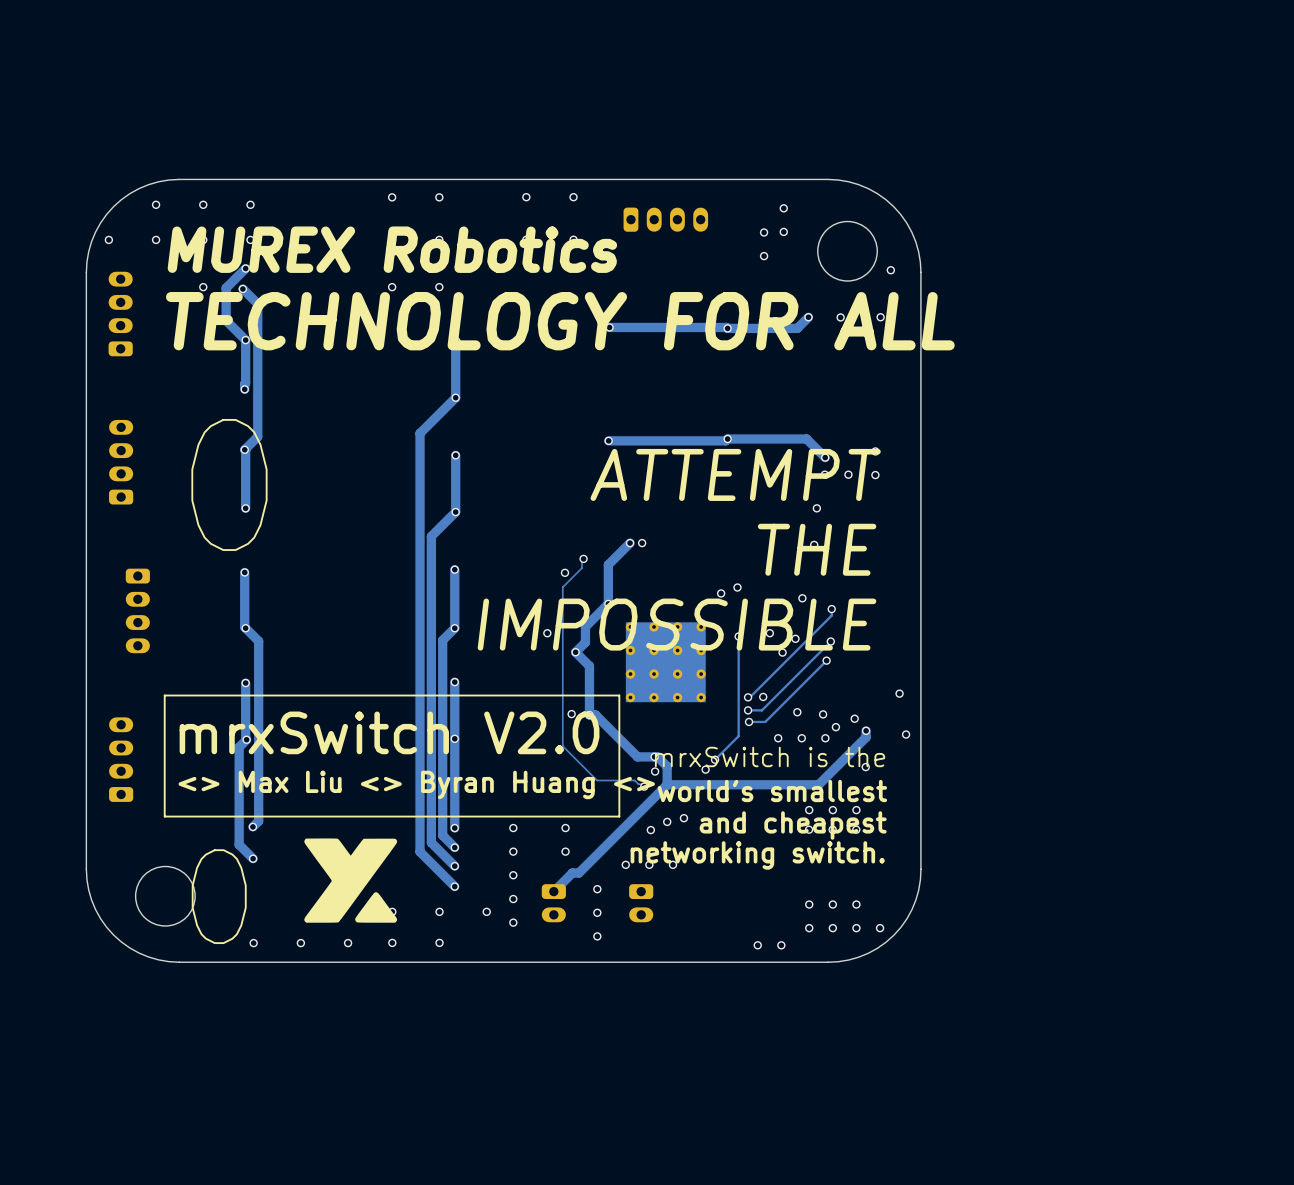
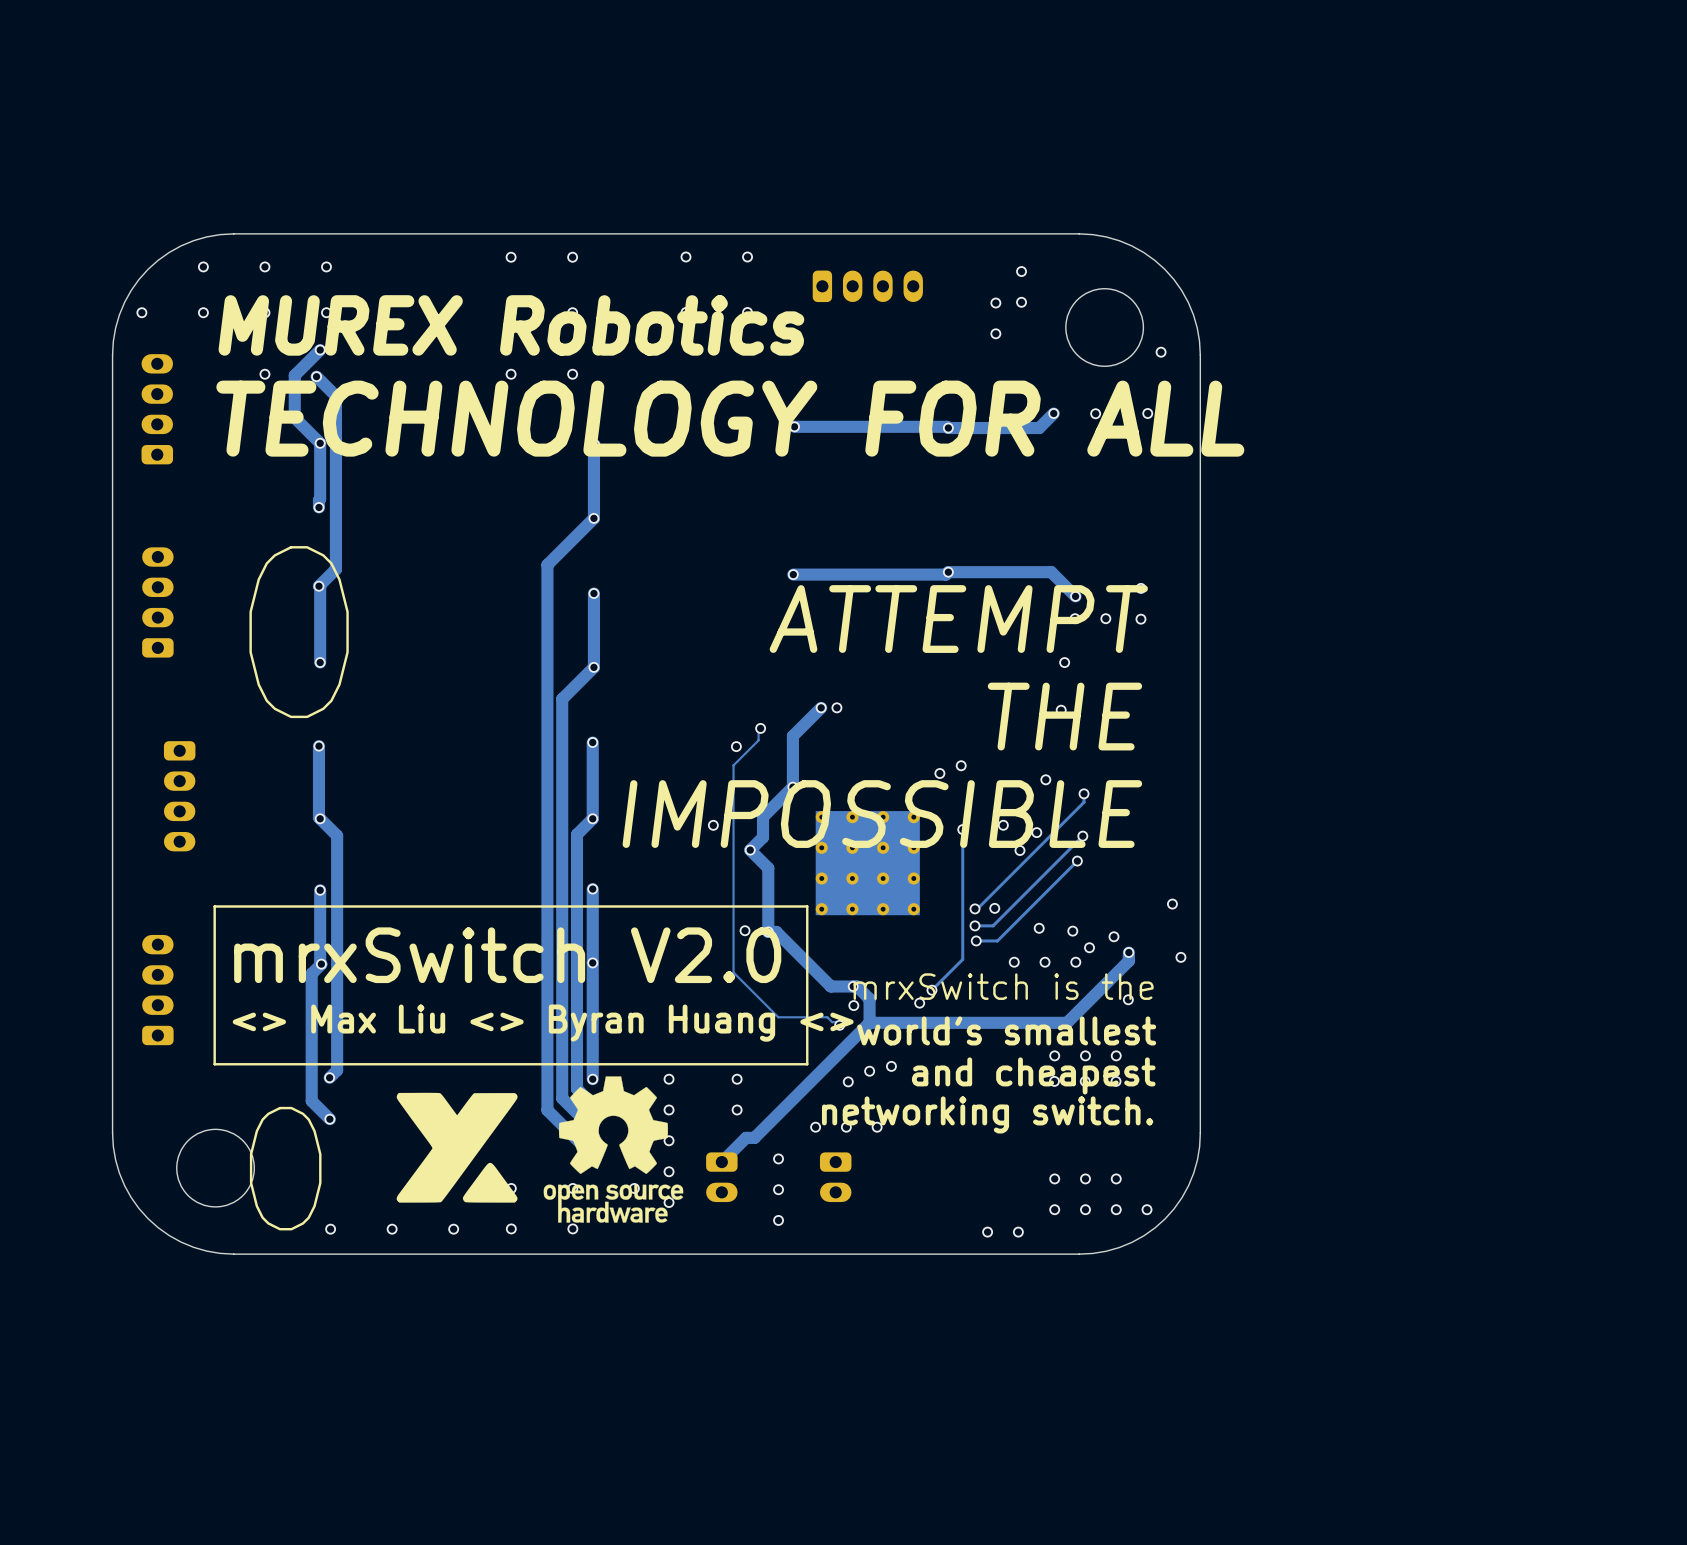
drawing: none -> [543, 1076, 684, 1223]

